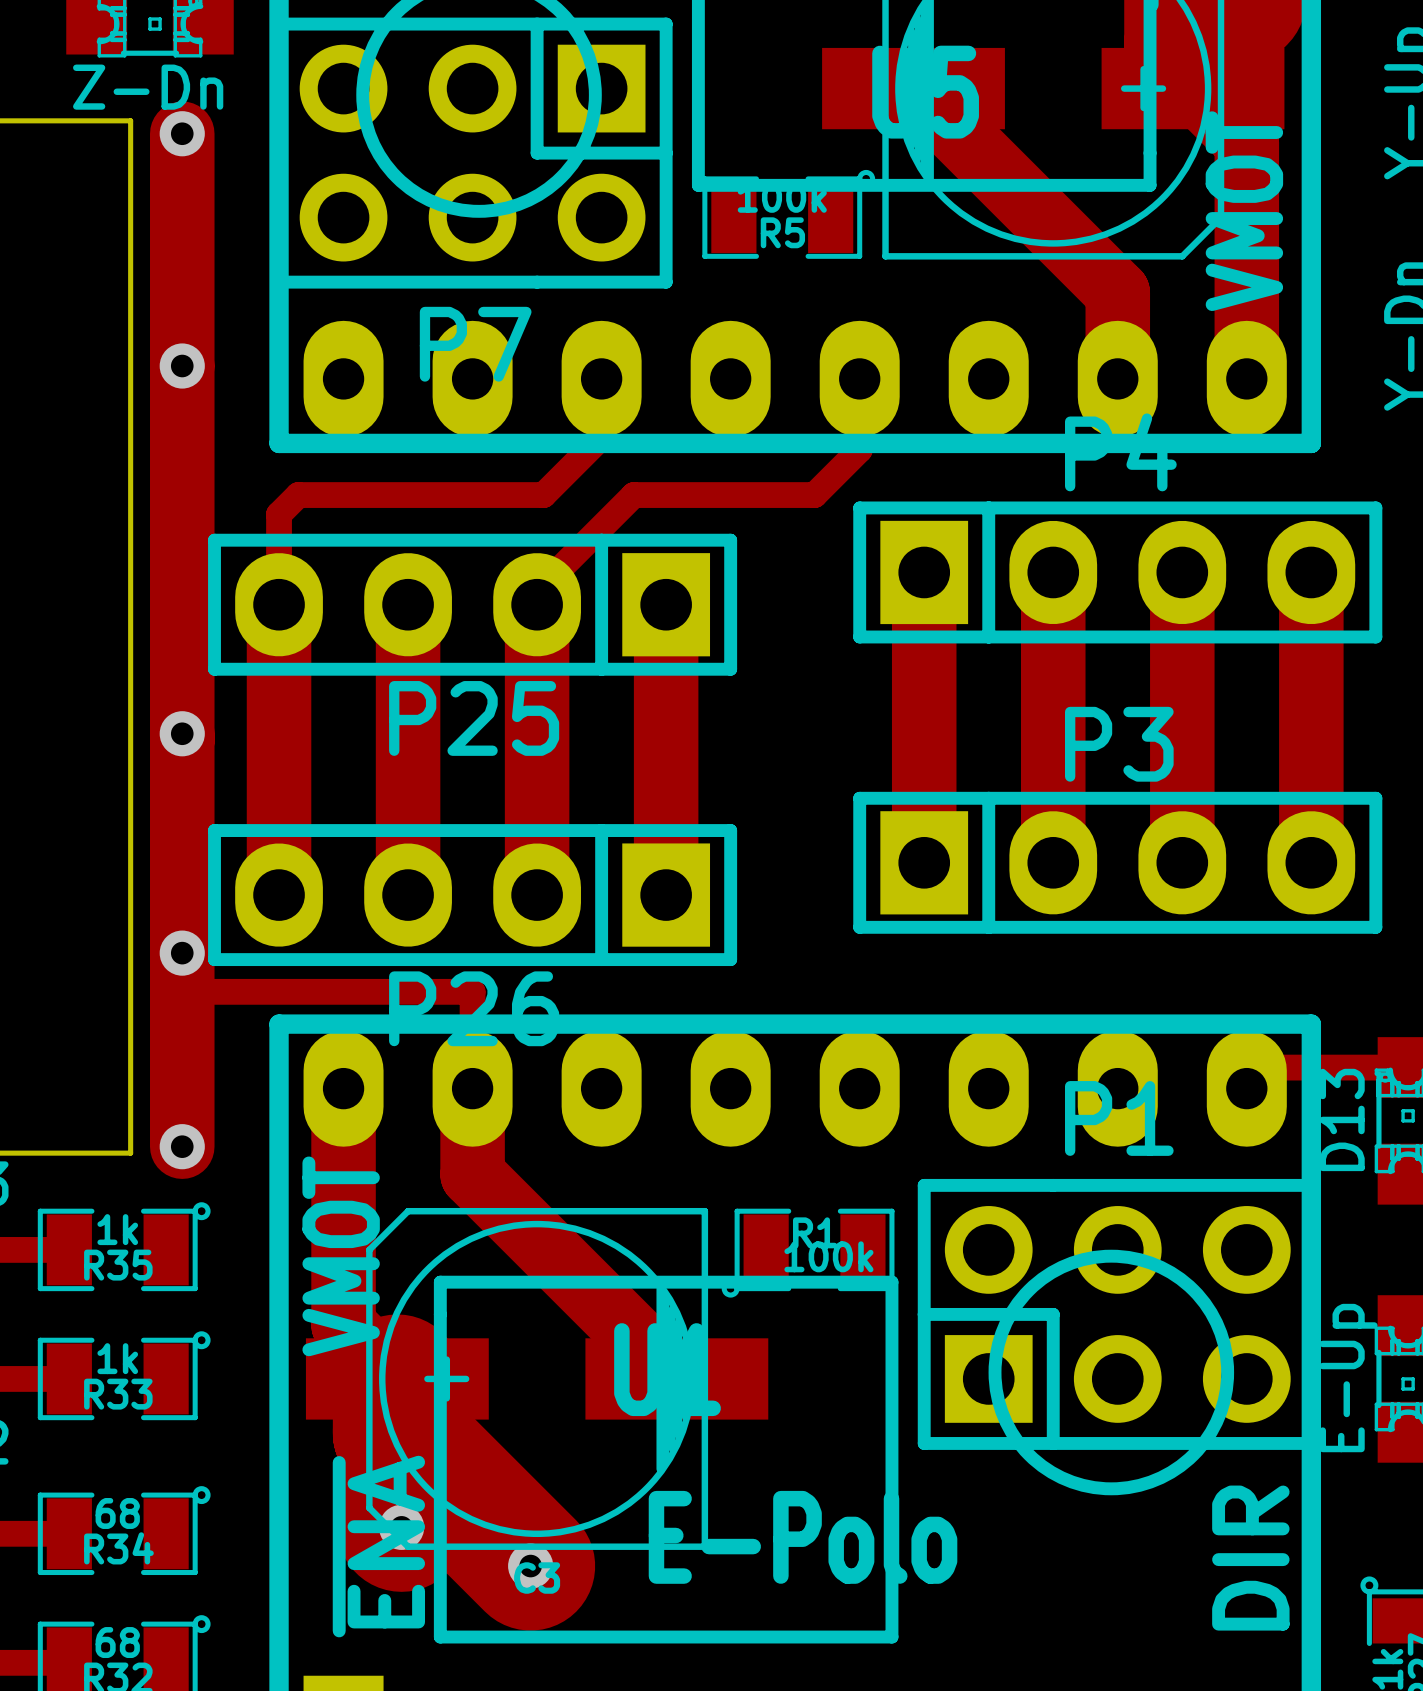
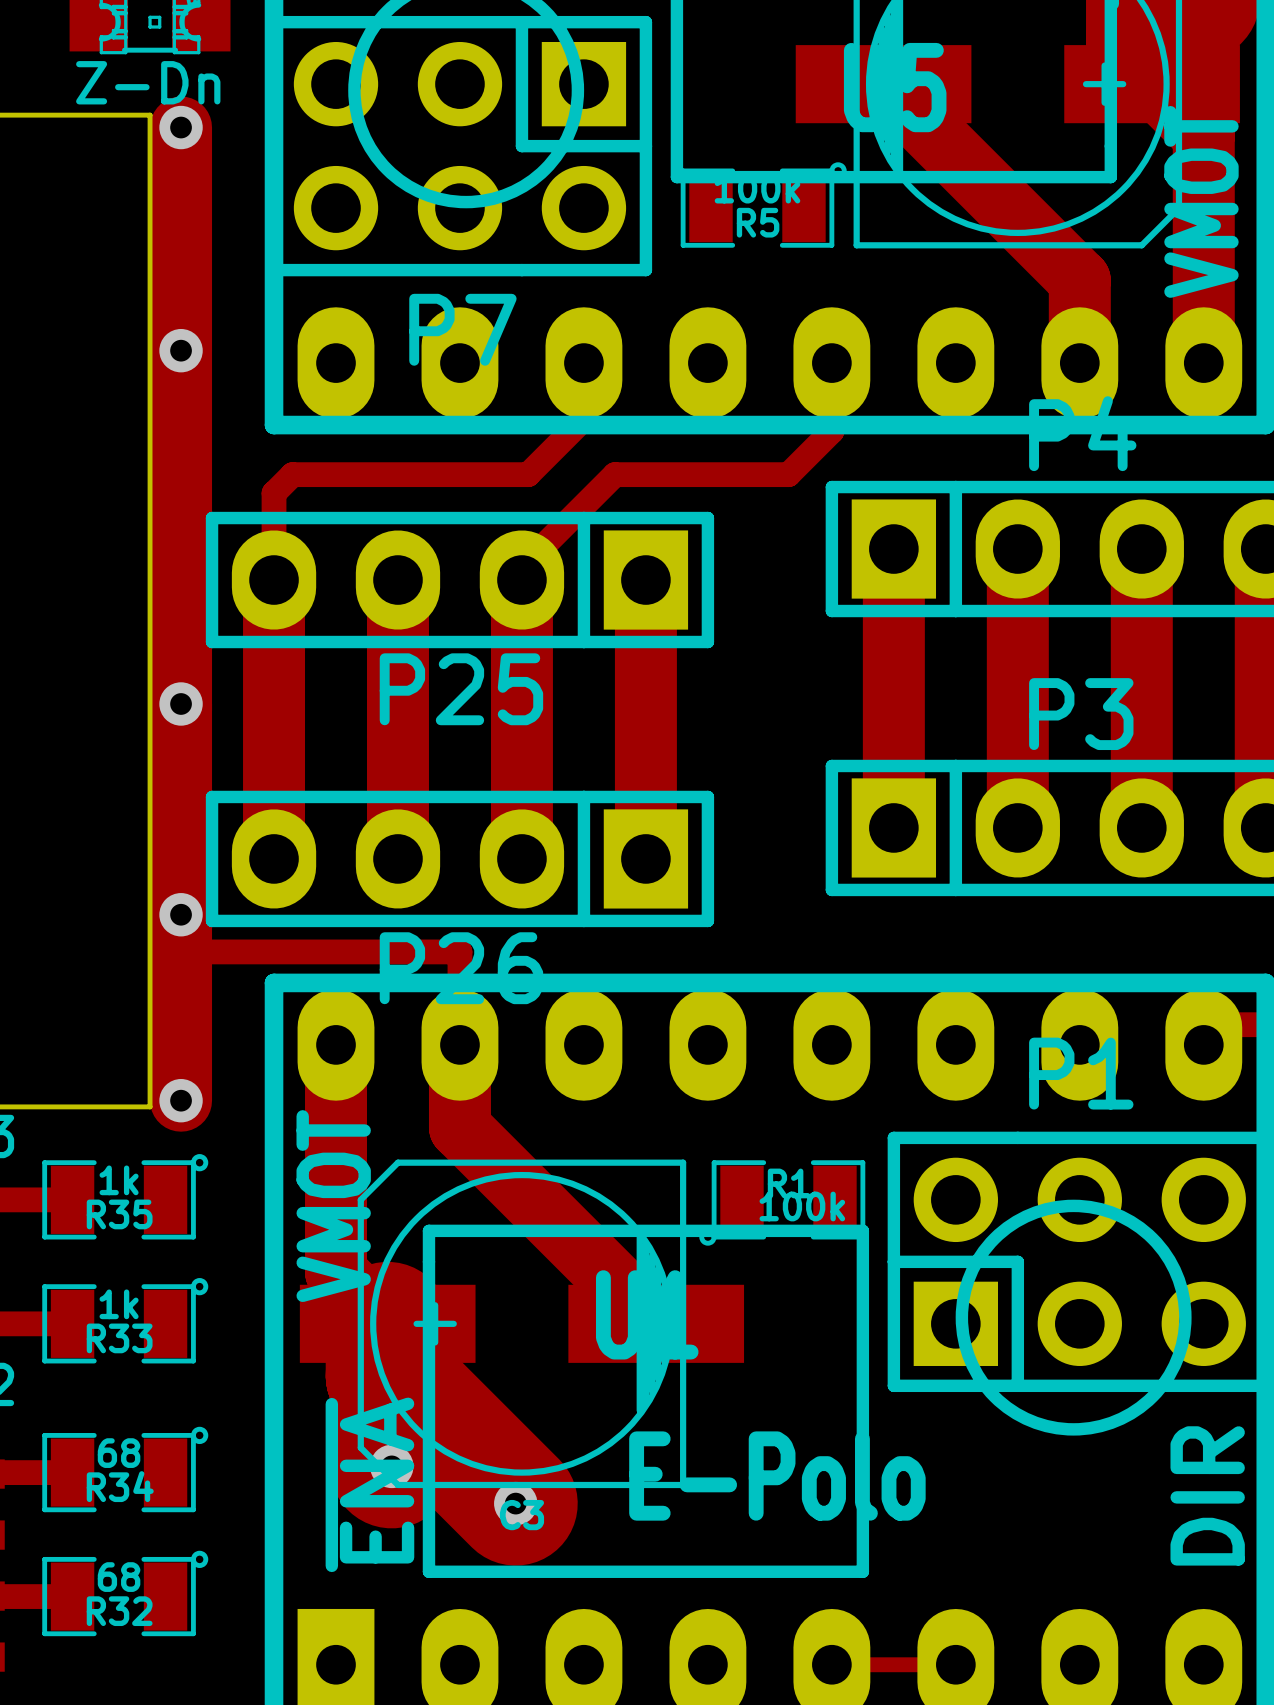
board edge: (130, 120) (130, 1153) -> (131, 115) (150, 115) (150, 1106) (131, 1106)

